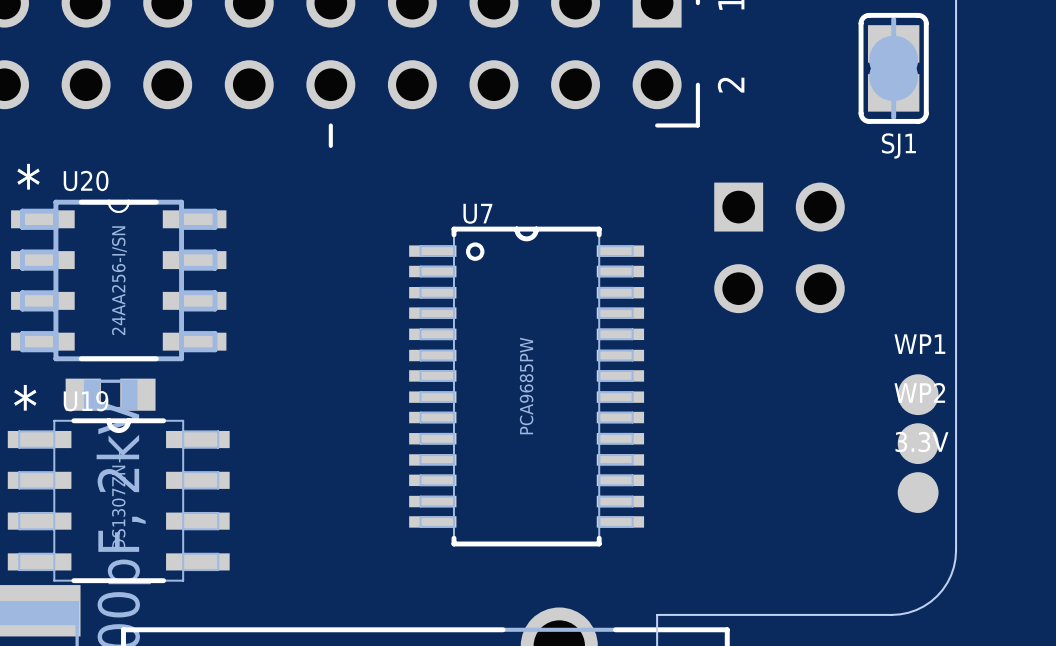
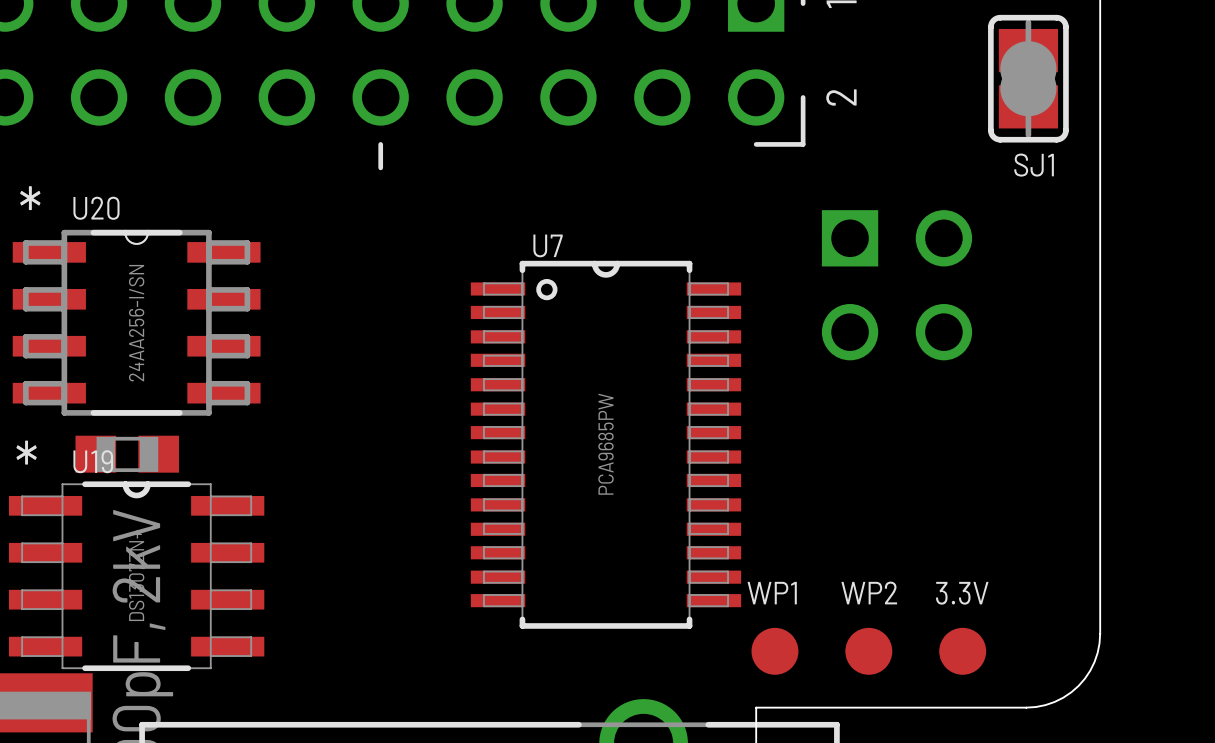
WP1 position: (918, 394) -> (774, 651)
WP2 position: (918, 443) -> (868, 651)
3.3V position: (918, 492) -> (962, 651)

